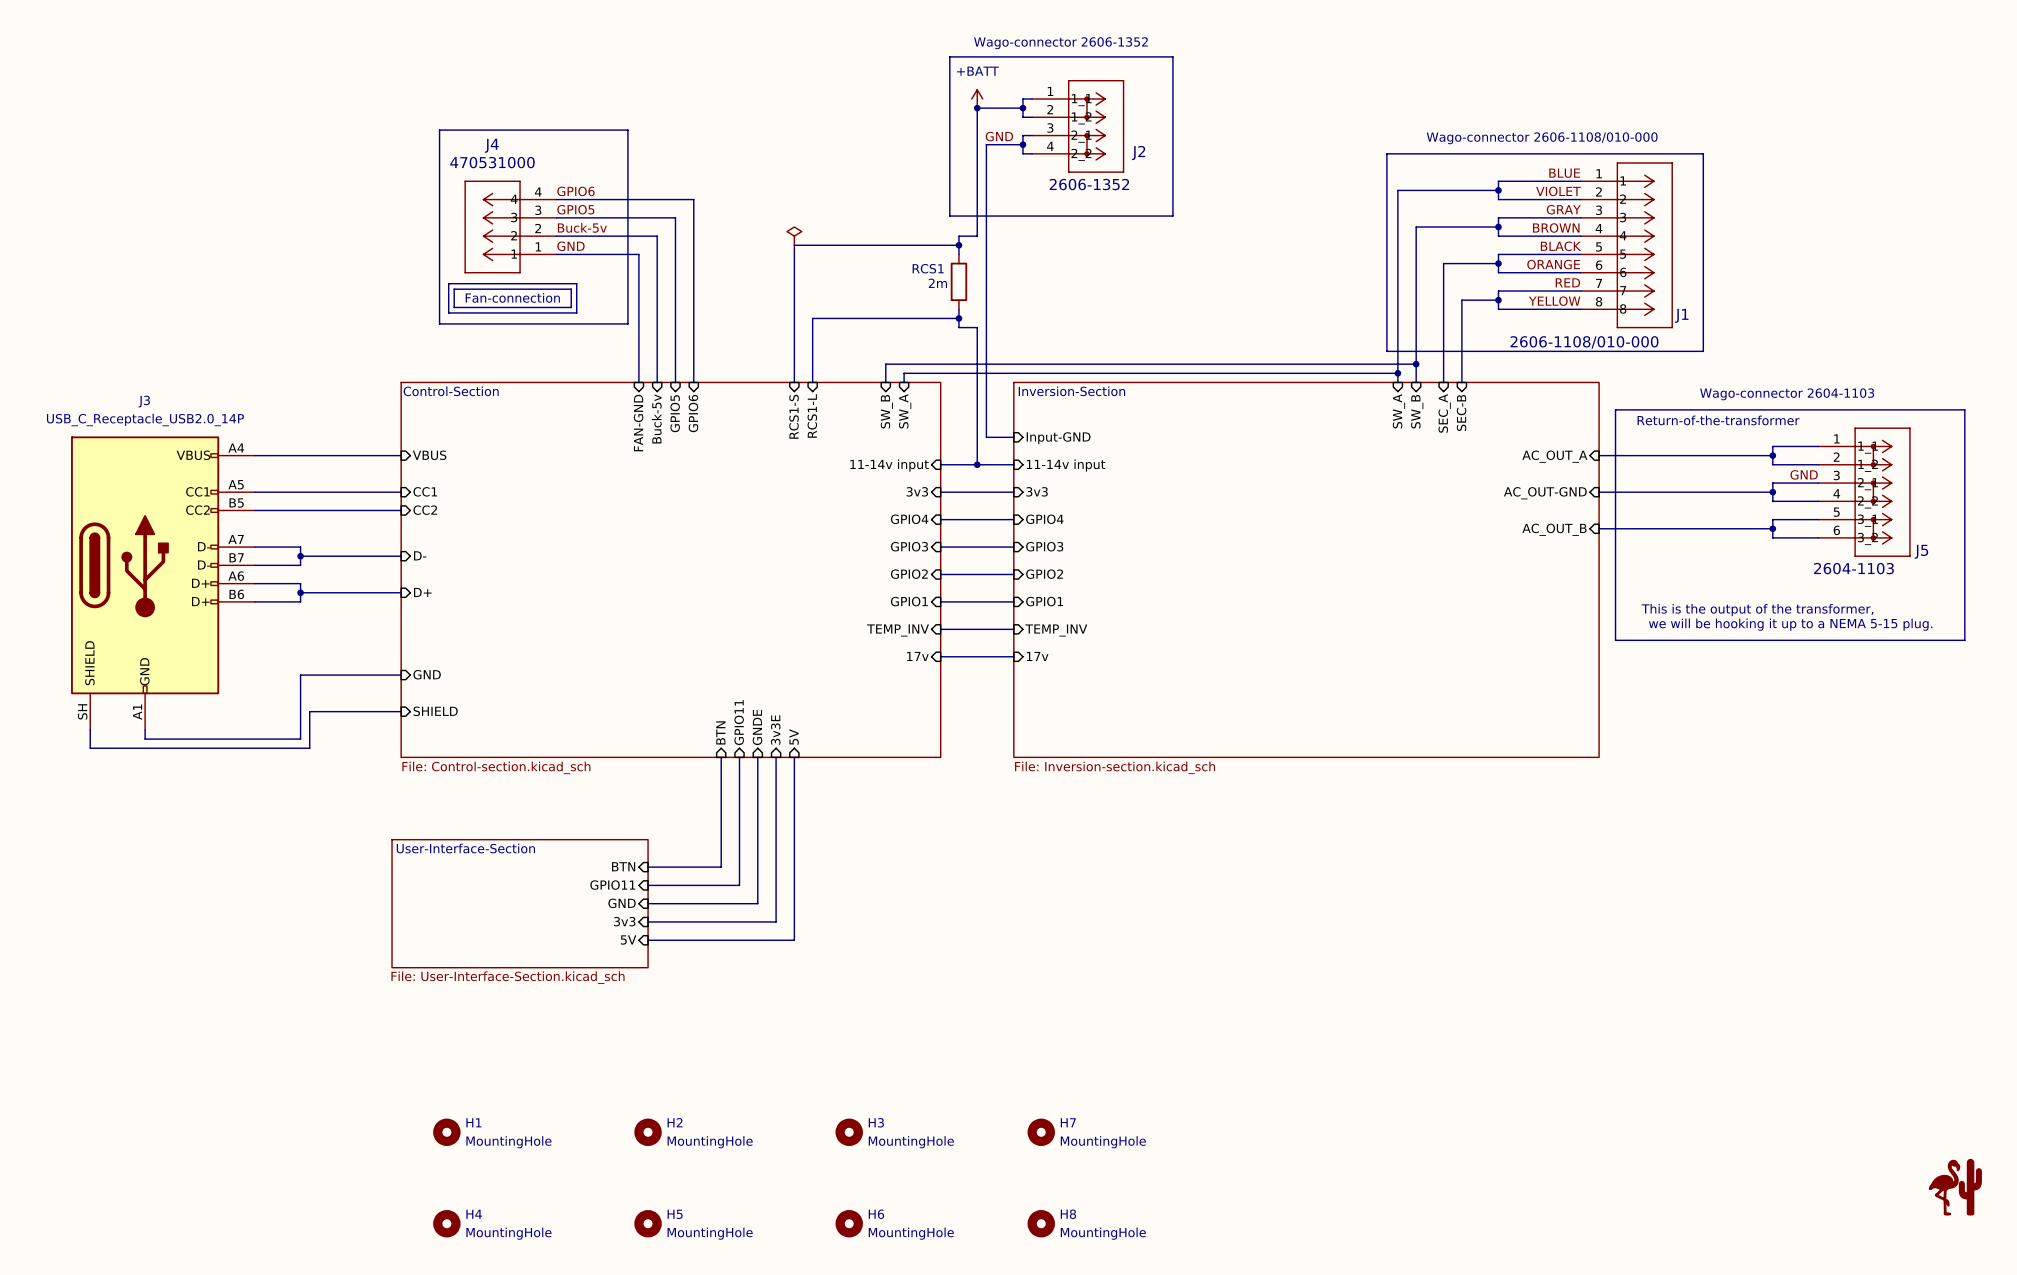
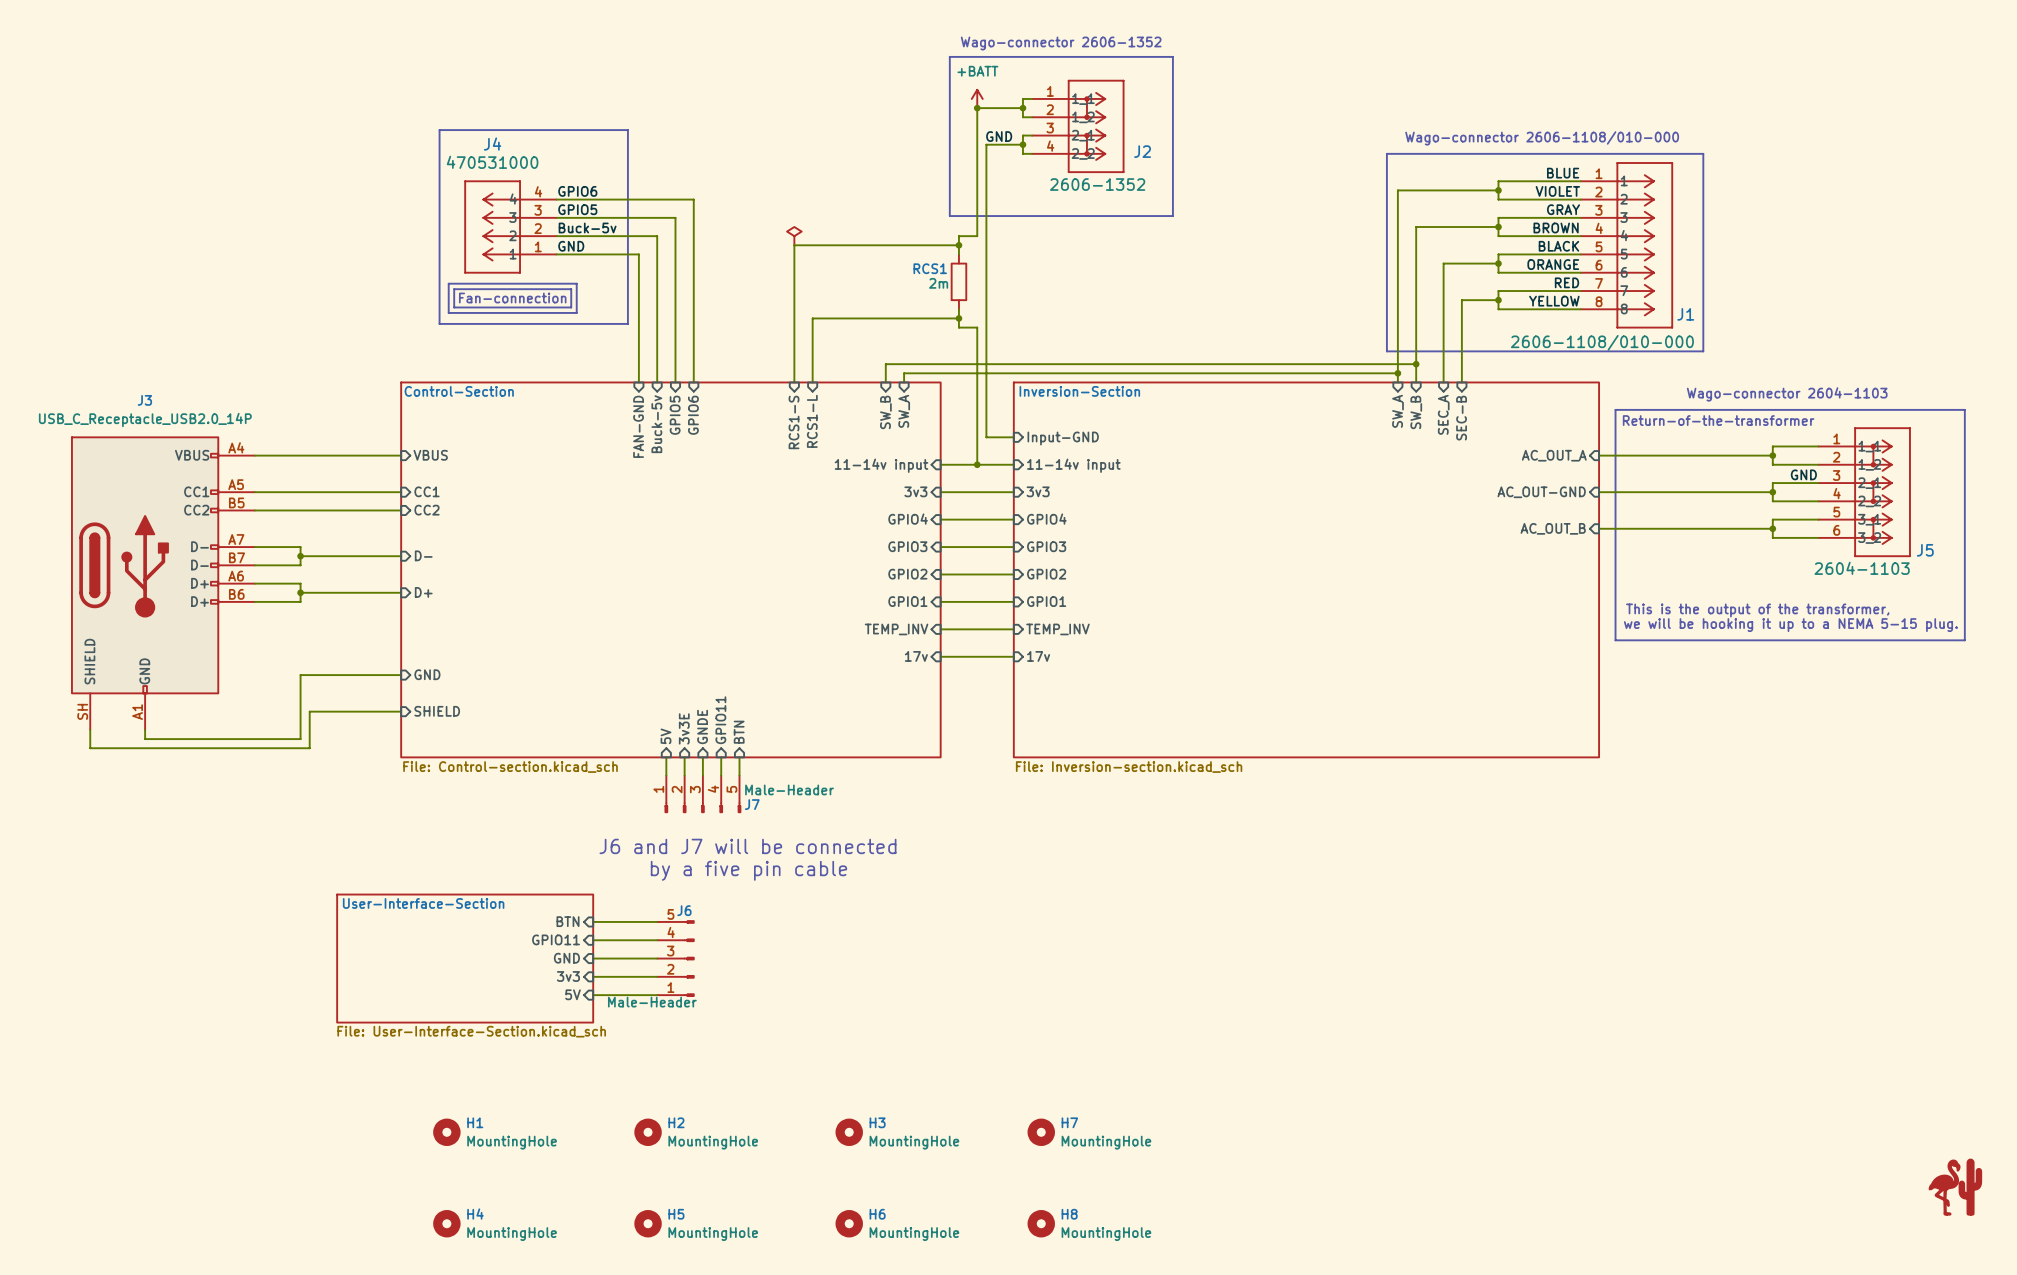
sheet pin: GPIO11 (739, 722) -> BTN (739, 732)
sheet pin position: GNDE (757, 727) -> GNDE (702, 726)
sheet pin position: 3v3E (775, 730) -> 3v3E (684, 728)
sheet pin: BTN (720, 732) -> GPIO11 (720, 720)
sheet pin: none -> 5V (666, 736)
sheet pin: 5V (794, 737) -> none
wire: none -> (666, 757) (666, 775)
wire: none -> (684, 757) (684, 775)
wire: none -> (702, 757) (702, 775)
wire: (757, 757) (757, 903) (648, 903) -> none
wire: (776, 757) (776, 921) (657, 921) -> none
wire: (794, 757) (794, 940) (657, 940) -> none
wire: (721, 775) (721, 867) (648, 867) -> none
wire: (739, 775) (739, 885) (648, 885) -> none
J7: none -> Male-Header (702, 794)
text: none -> J6 and J7 will be connected (747, 846)
sheet pin position: BTN (623, 866) -> BTN (568, 921)
text: none -> by a five pin cable (748, 870)
sheet pin position: GPIO11 (612, 885) -> GPIO11 (556, 939)
sheet User-Interface-Section position: (520, 903) -> (465, 958)
sheet pin position: GND (622, 903) -> GND (566, 958)
wire: none -> (593, 921) (648, 921)
sheet pin position: 3v3 (624, 921) -> 3v3 (568, 976)
wire: none -> (593, 940) (648, 940)
sheet pin position: 5V (628, 940) -> 5V (573, 994)
wire: none -> (593, 958) (657, 958)
J6: none -> Male-Header (675, 958)
wire: none -> (593, 976) (657, 976)
wire: none -> (593, 995) (657, 995)

